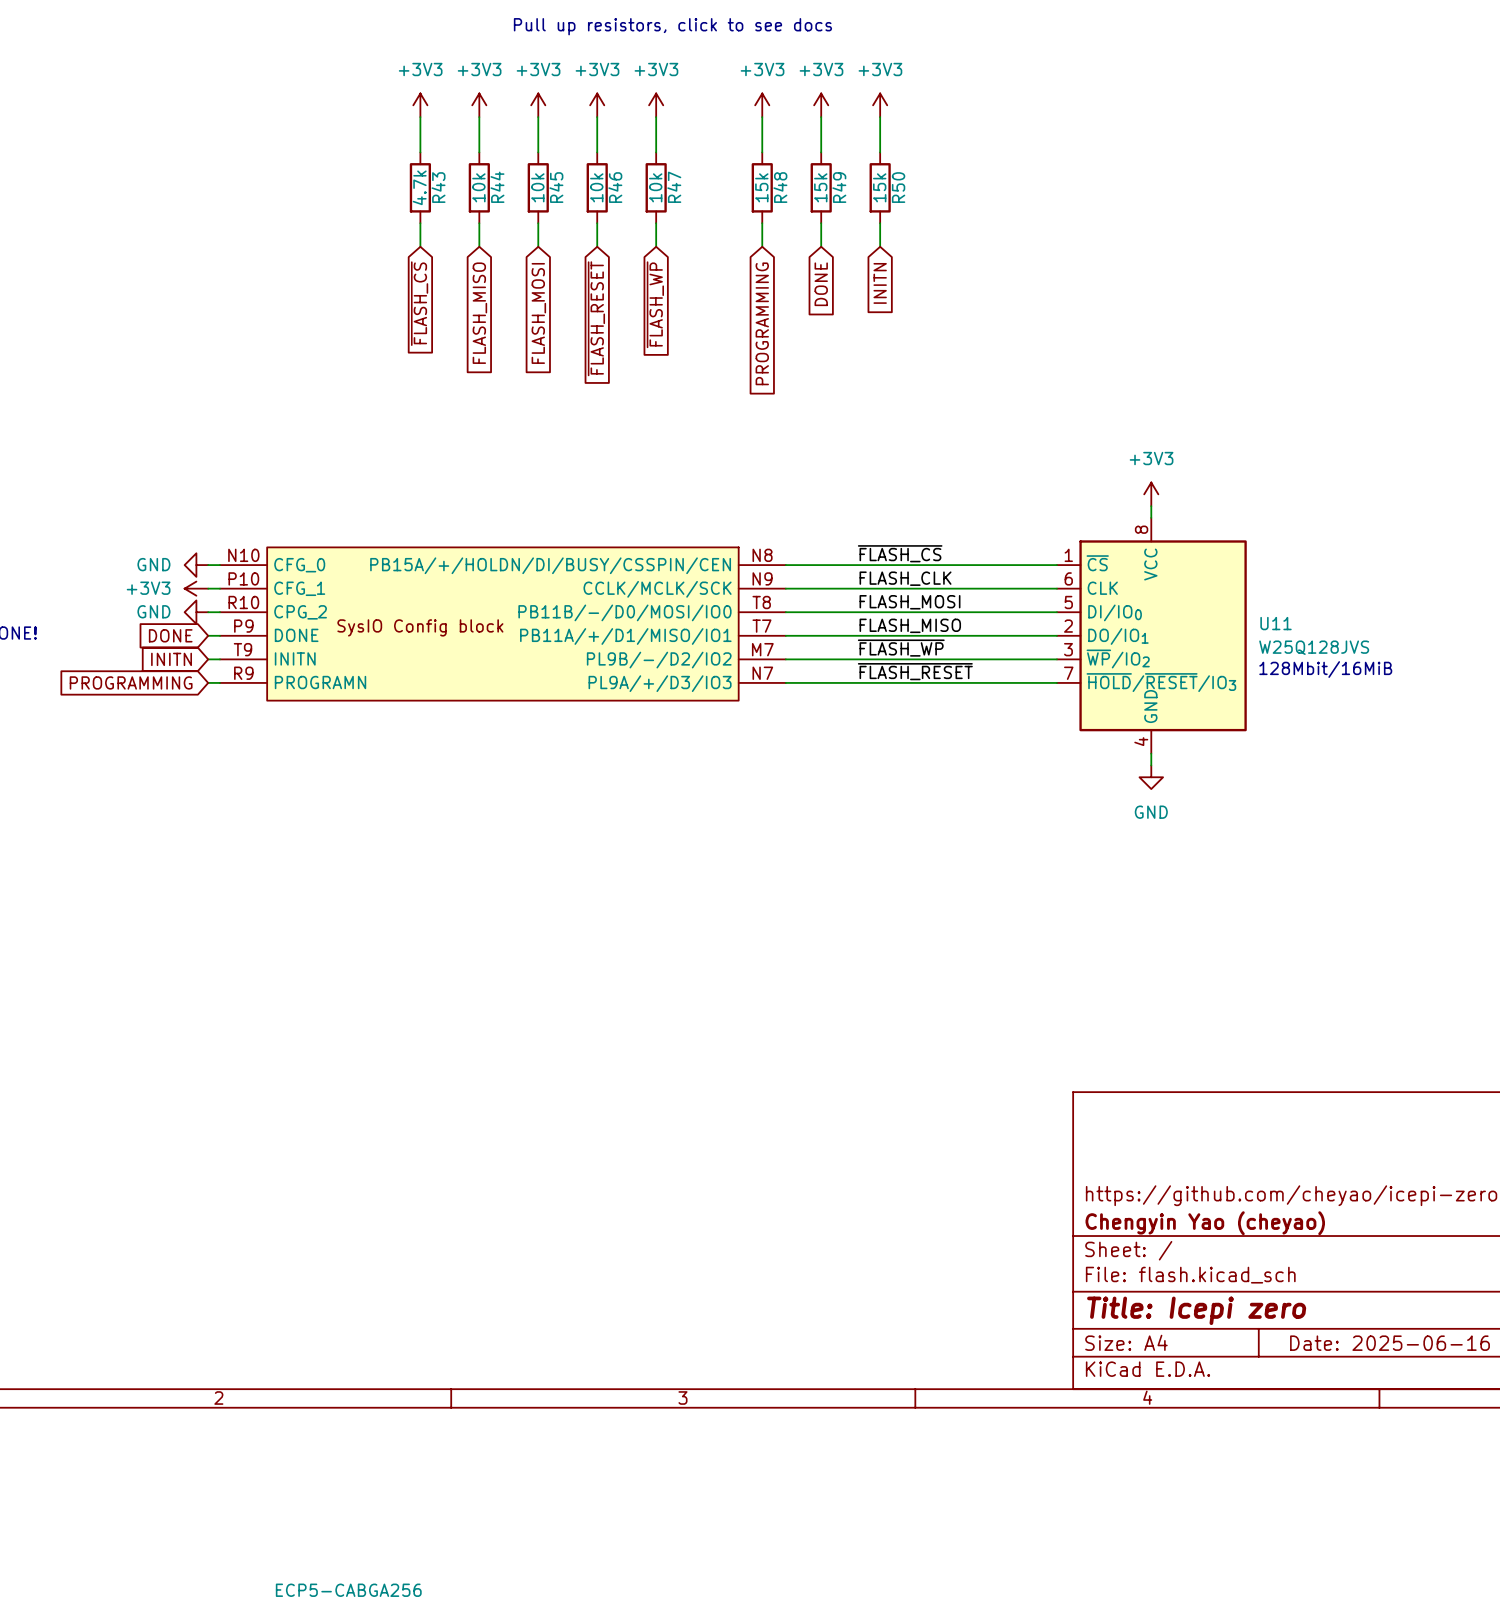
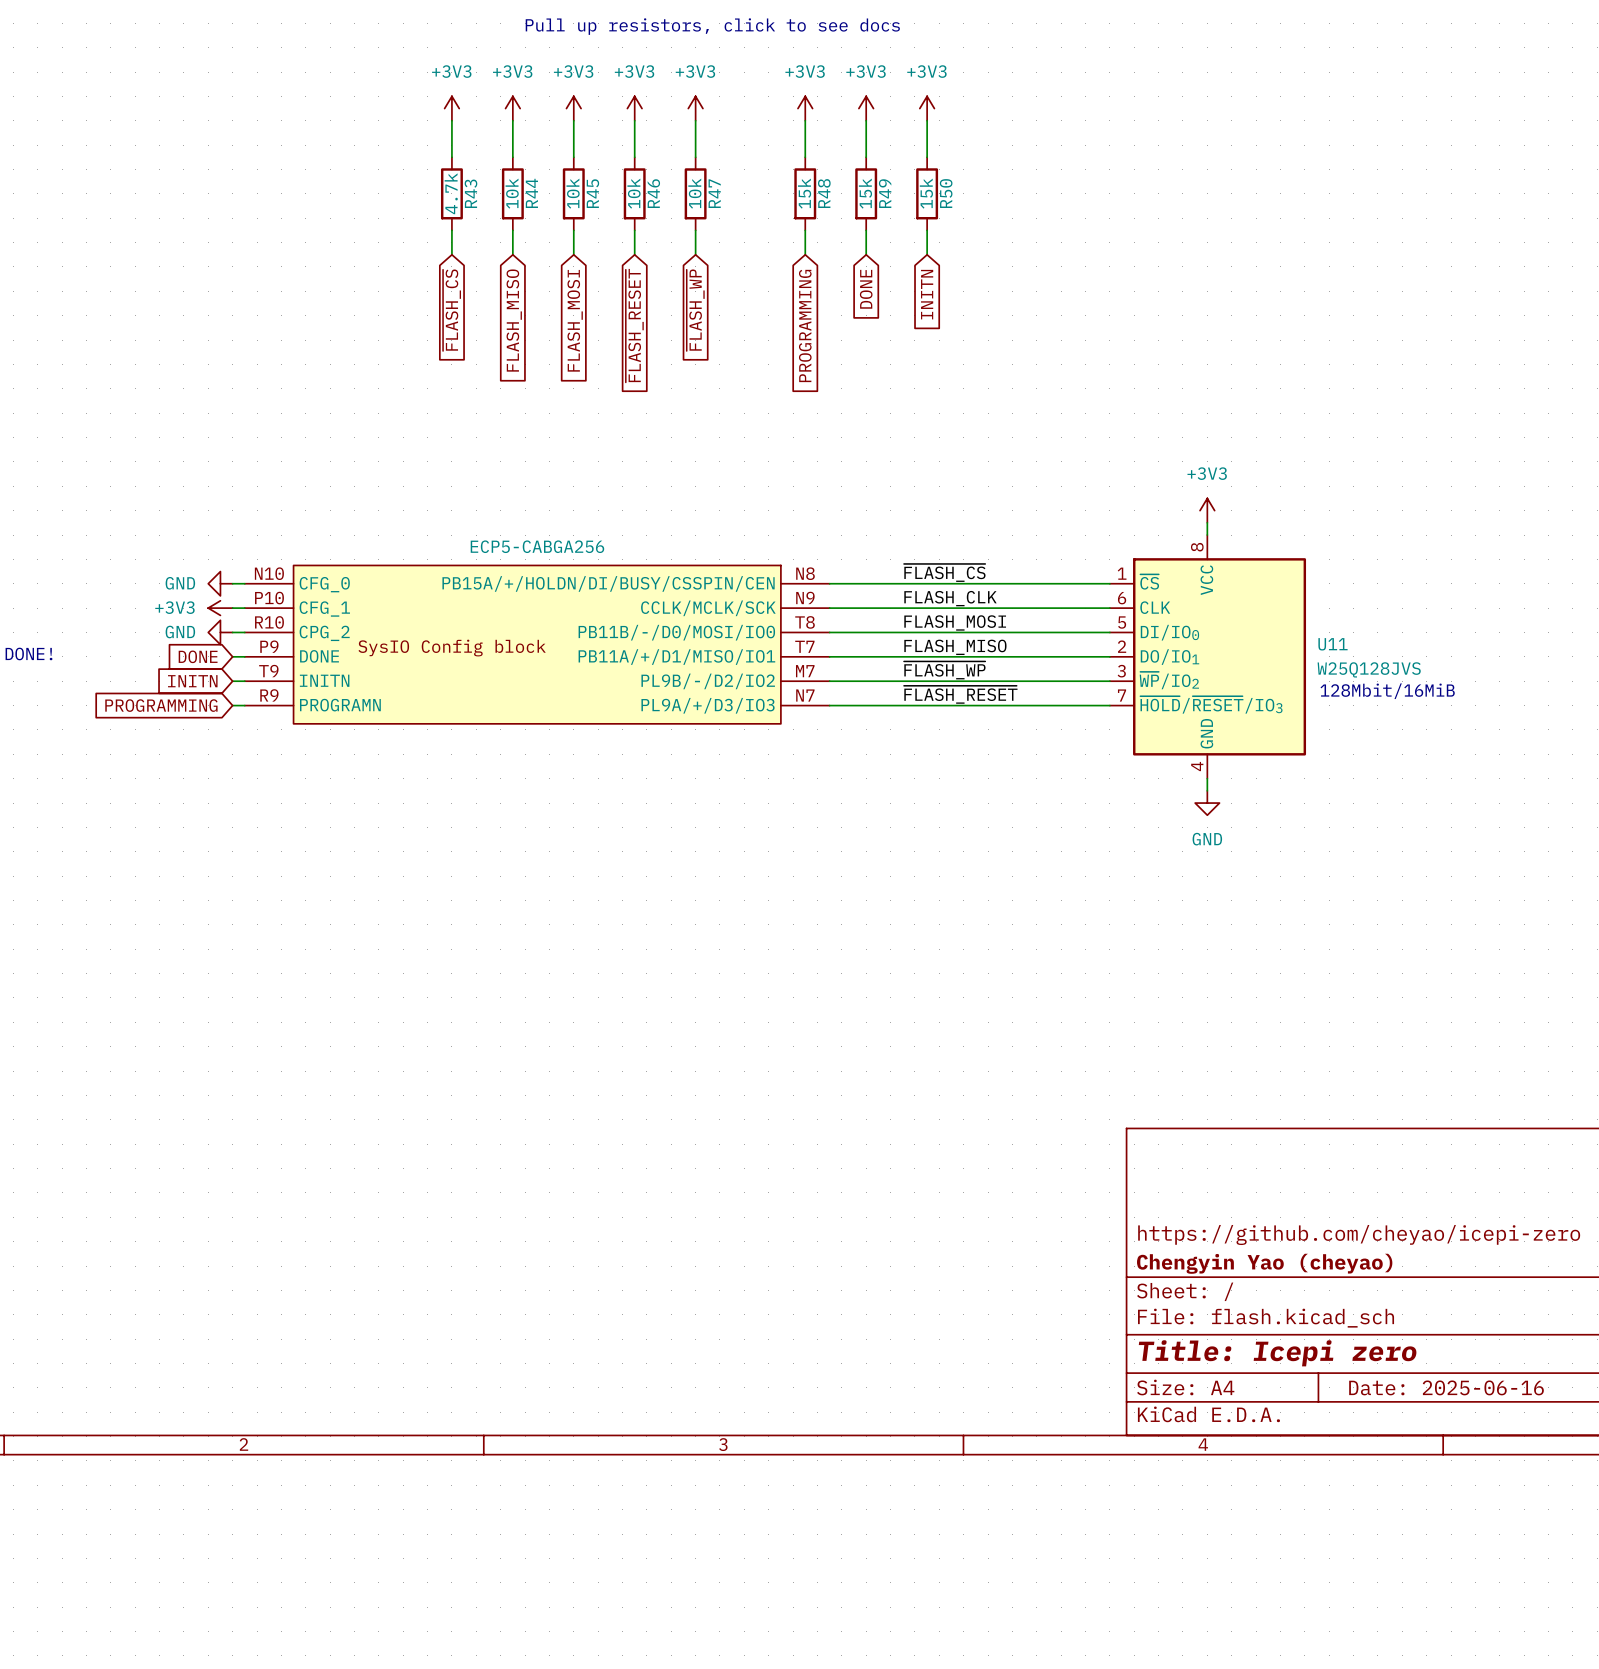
part value position: ECP5-CABGA256 (348, 1590) -> ECP5-CABGA256 (537, 546)

